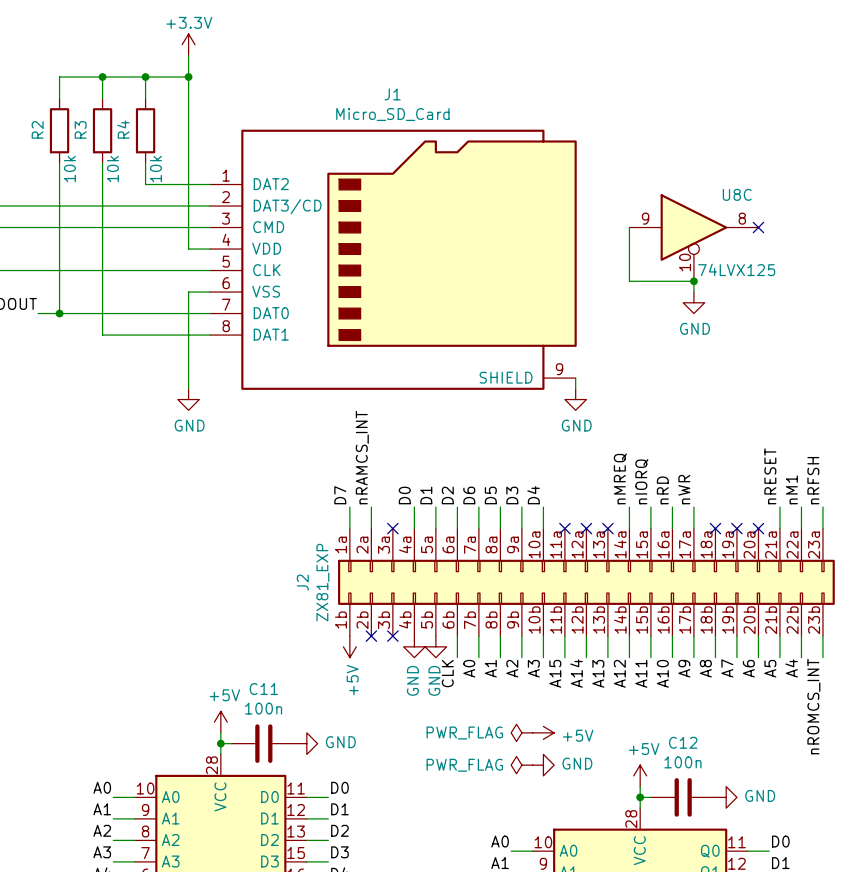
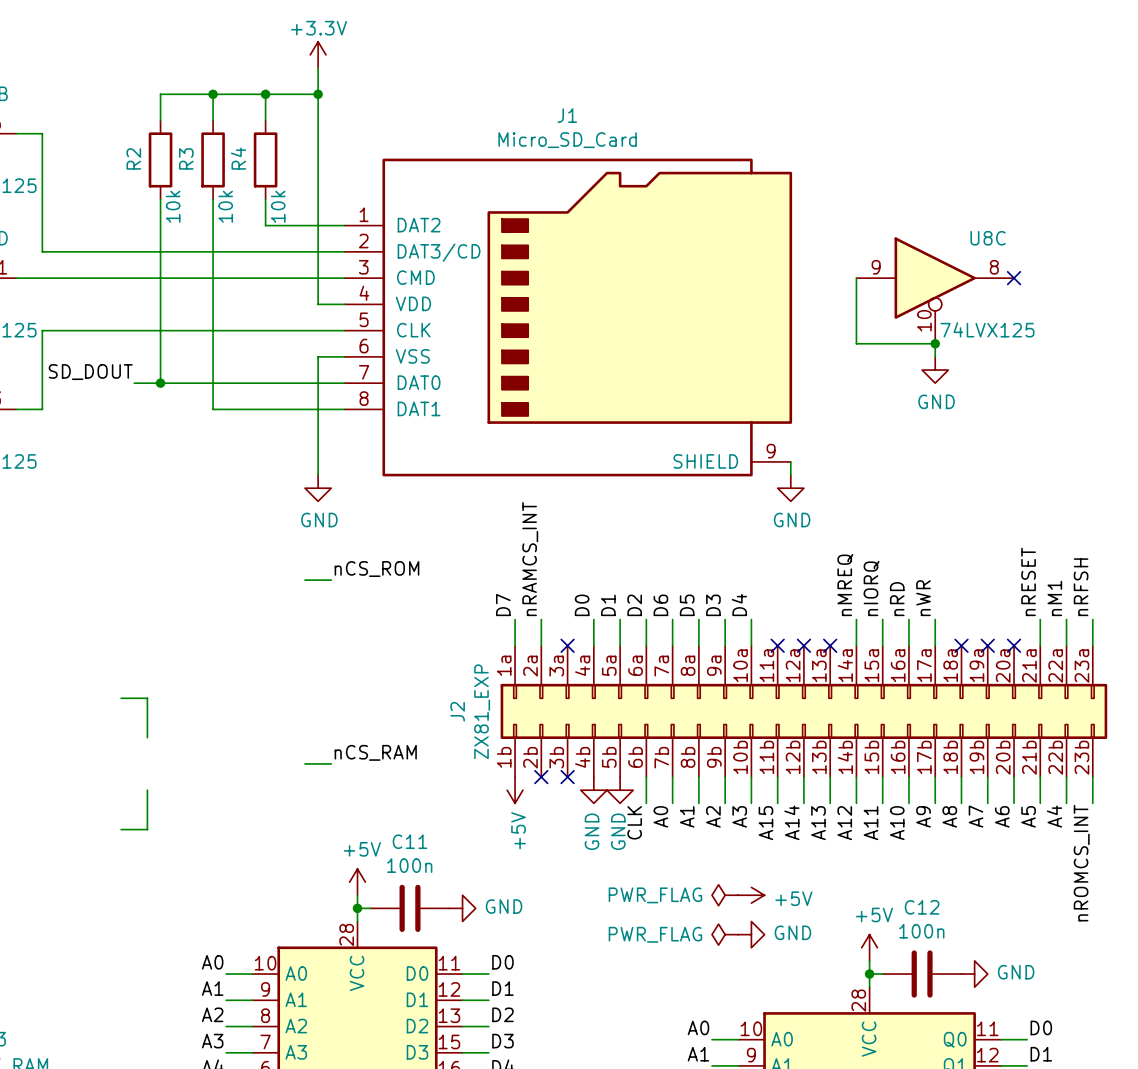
label: none -> nCS_ROM (376, 569)
wire: none -> (304, 580) (331, 580)
wire: none -> (121, 698) (147, 698) (147, 737)
label: none -> nCS_RAM (375, 752)
wire: none -> (304, 763) (331, 763)
wire: none -> (147, 790) (147, 829) (121, 829)

